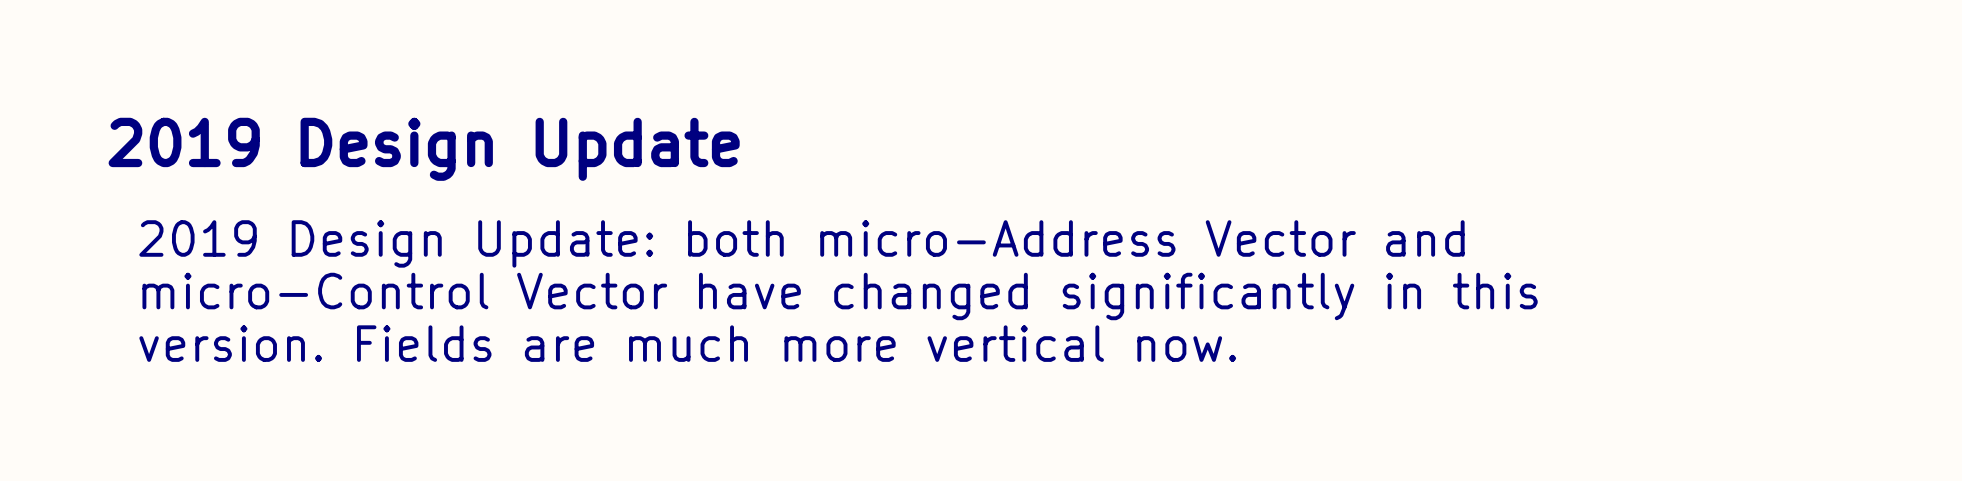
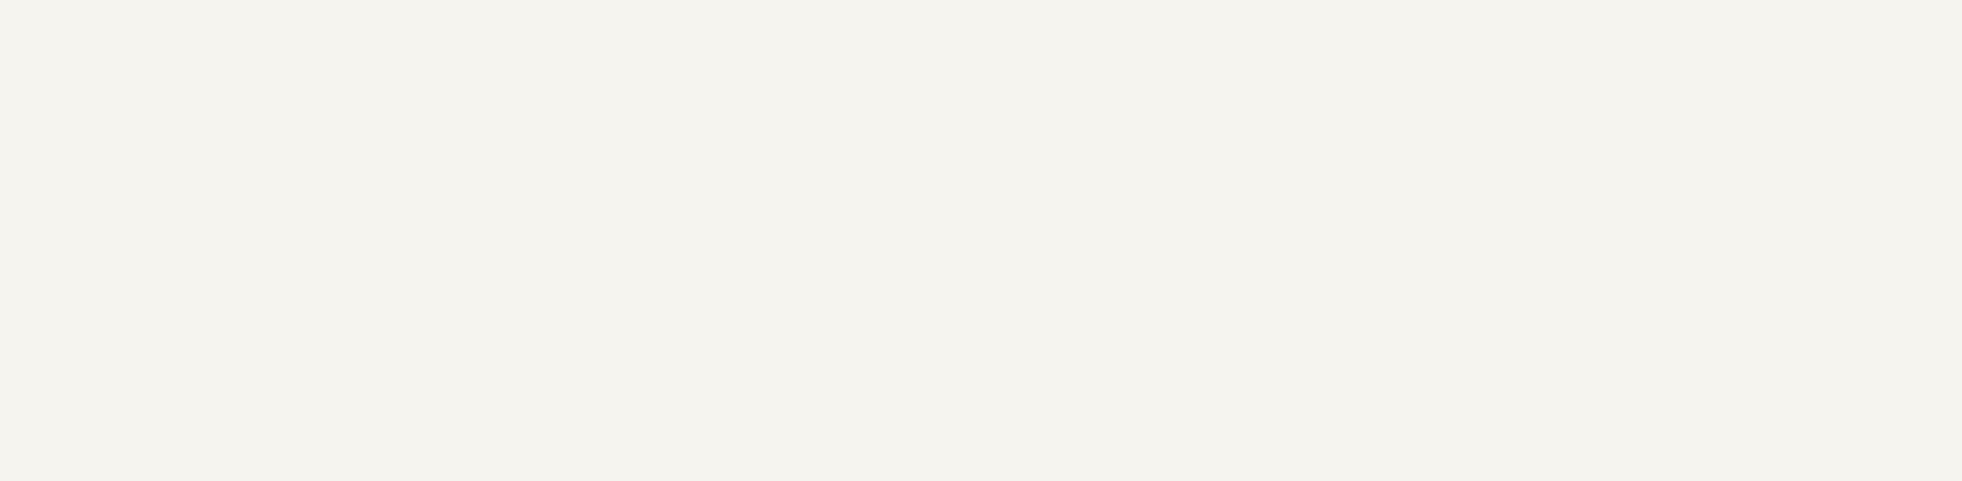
text: 2019 Design Update (424, 149) -> none
text: 2019 Design Update: both micro-Address Vector and (801, 243) -> none
text: micro-Control Vector have changed significantly in this (840, 296) -> none
text: version. Fields are much more vertical now. (687, 343) -> none

